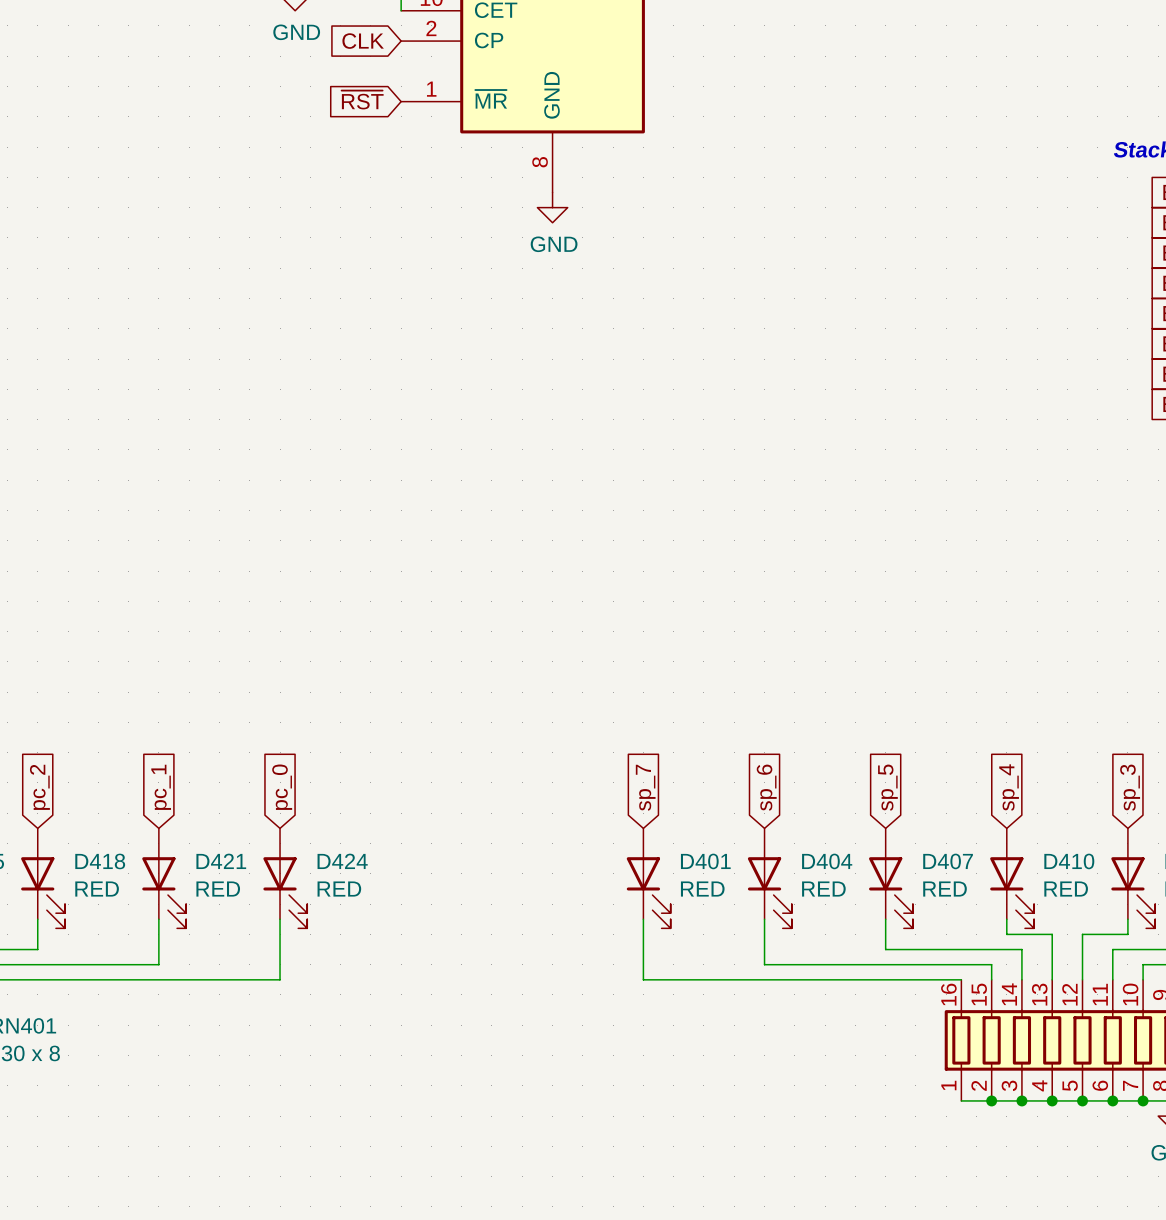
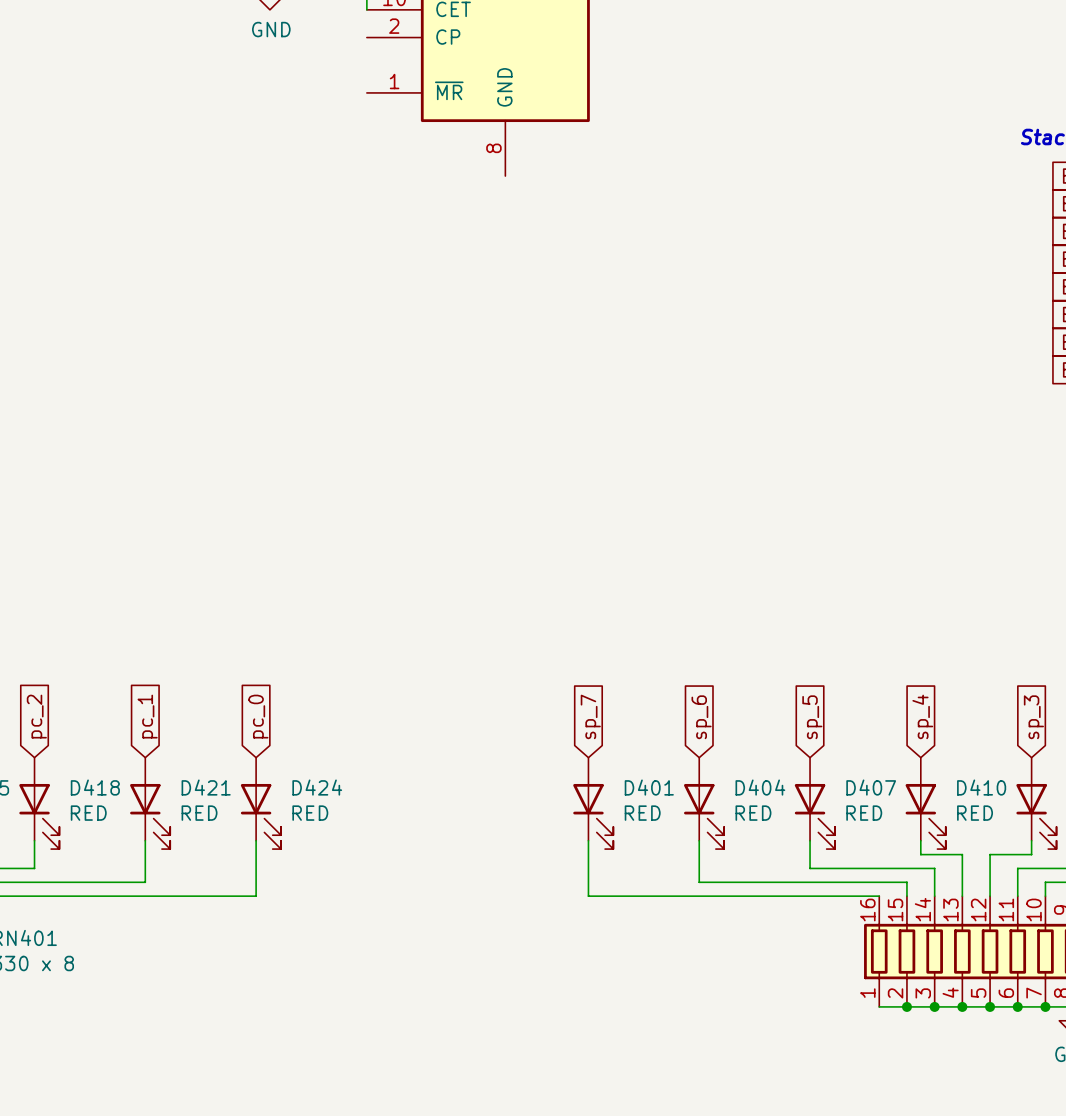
global label: CLK (363, 41) -> none
global label: ~{RST} (362, 99) -> none
power symbol: GND (552, 207) -> none

